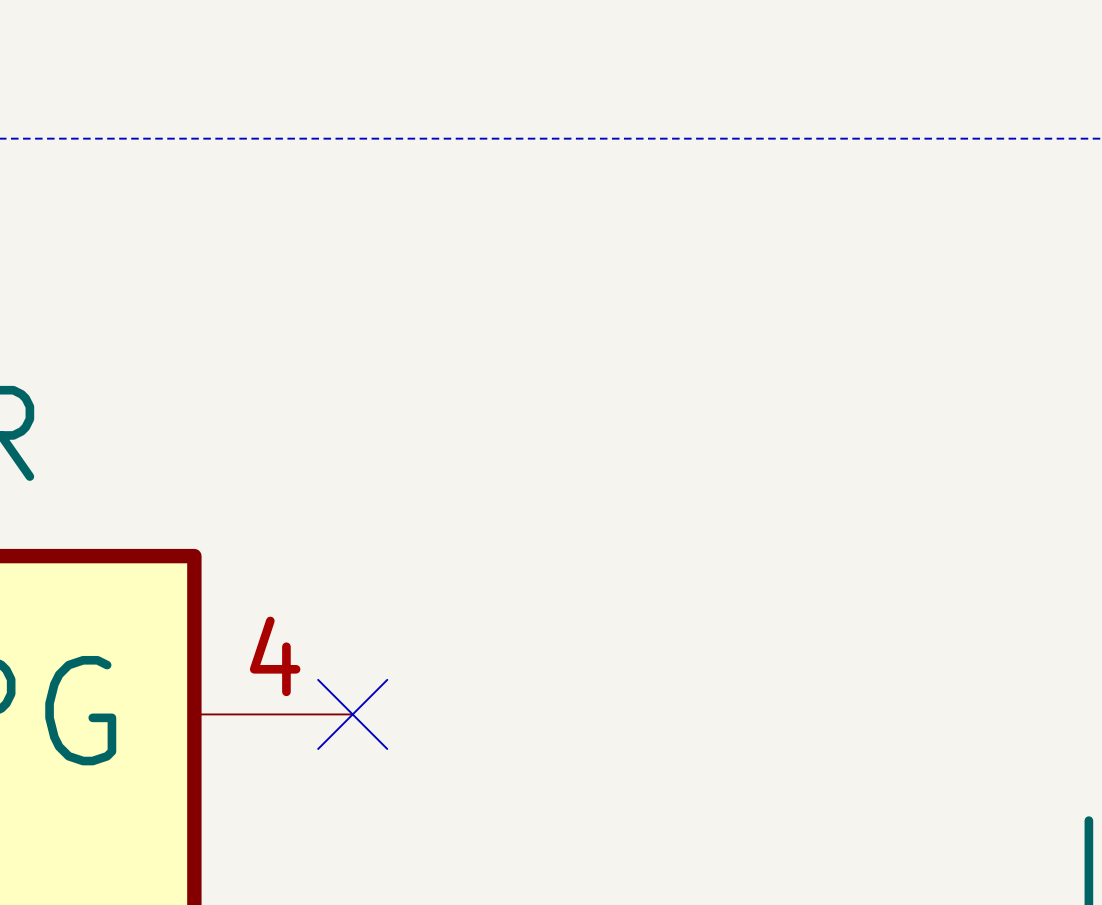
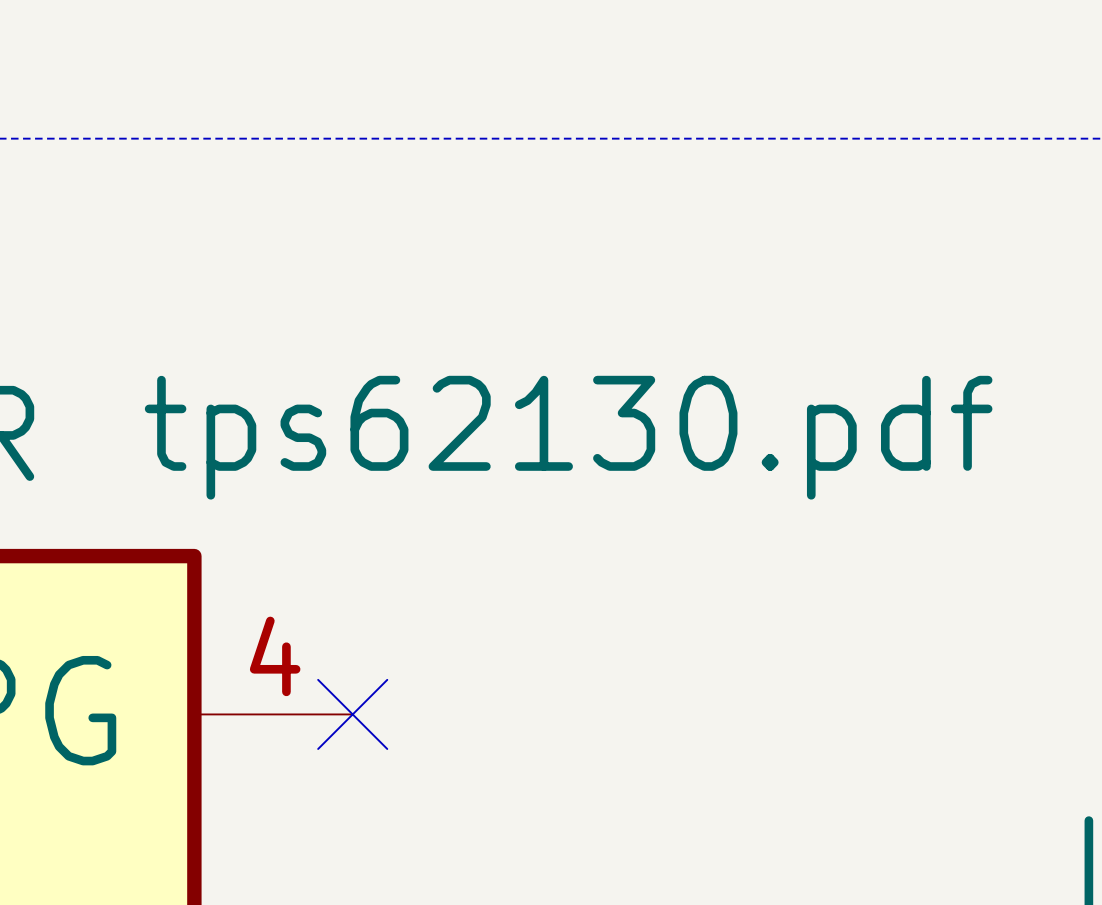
part text: none -> tps62130.pdf (568, 437)

